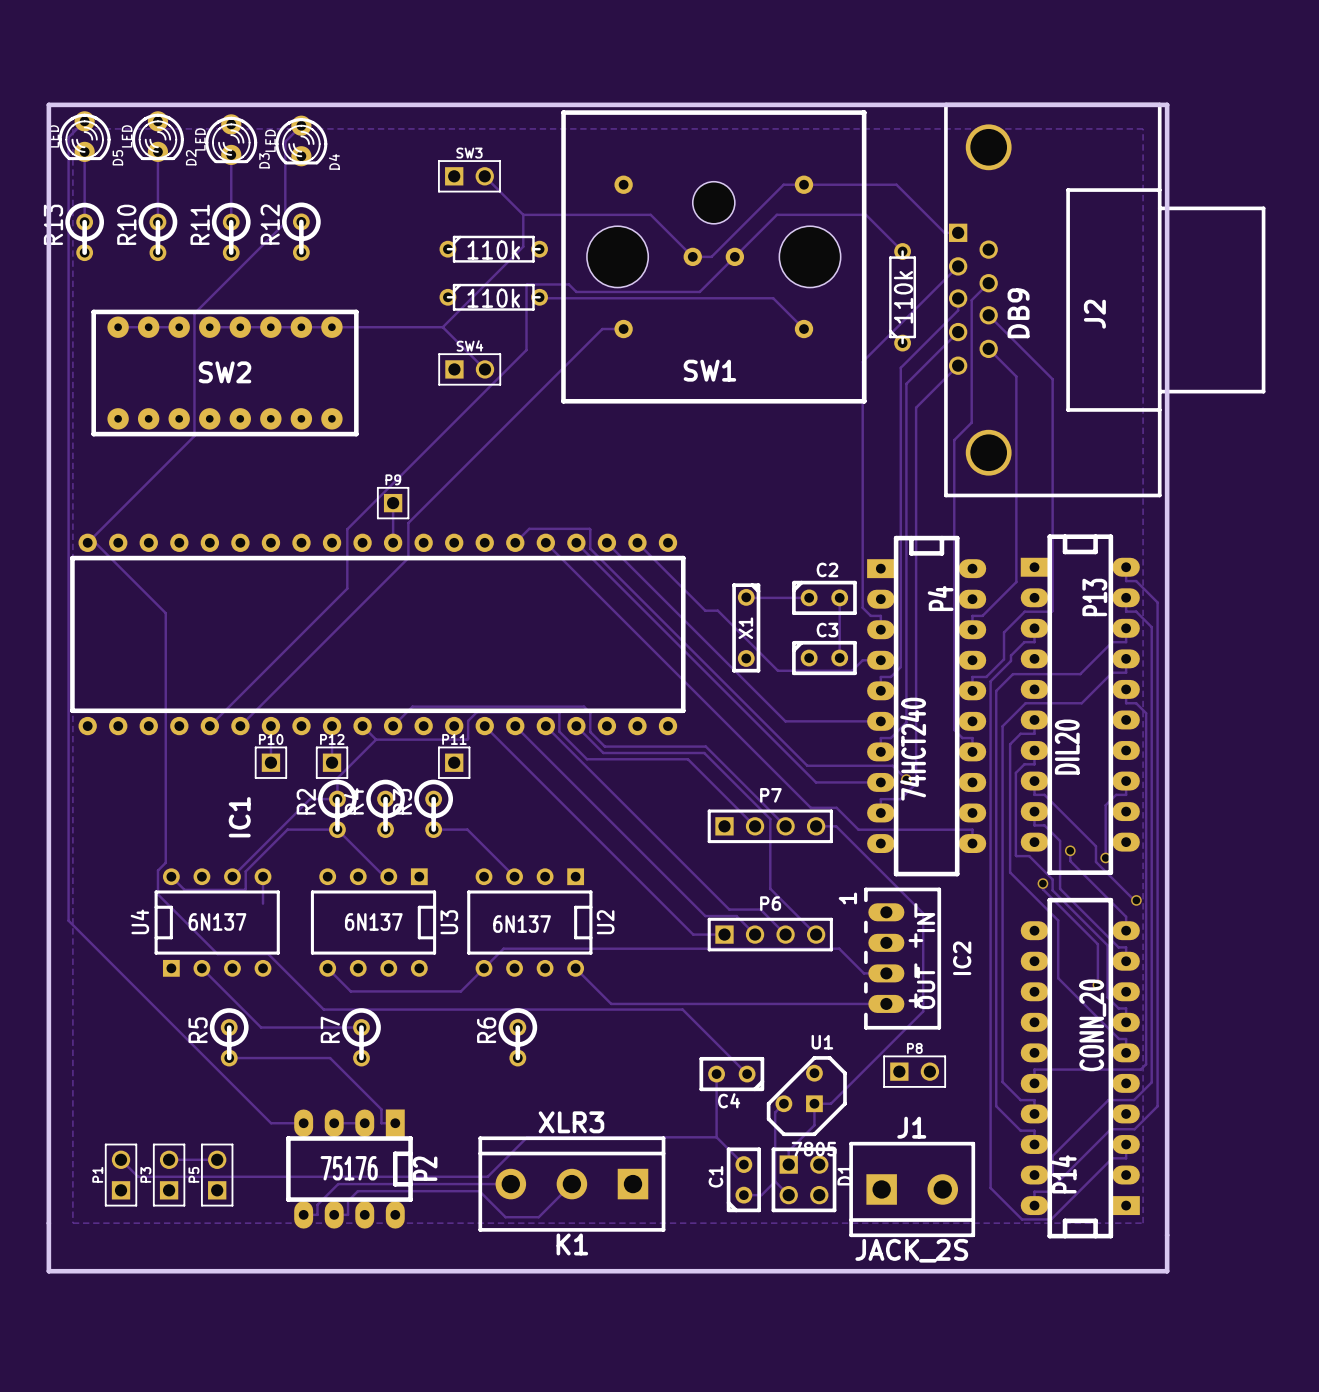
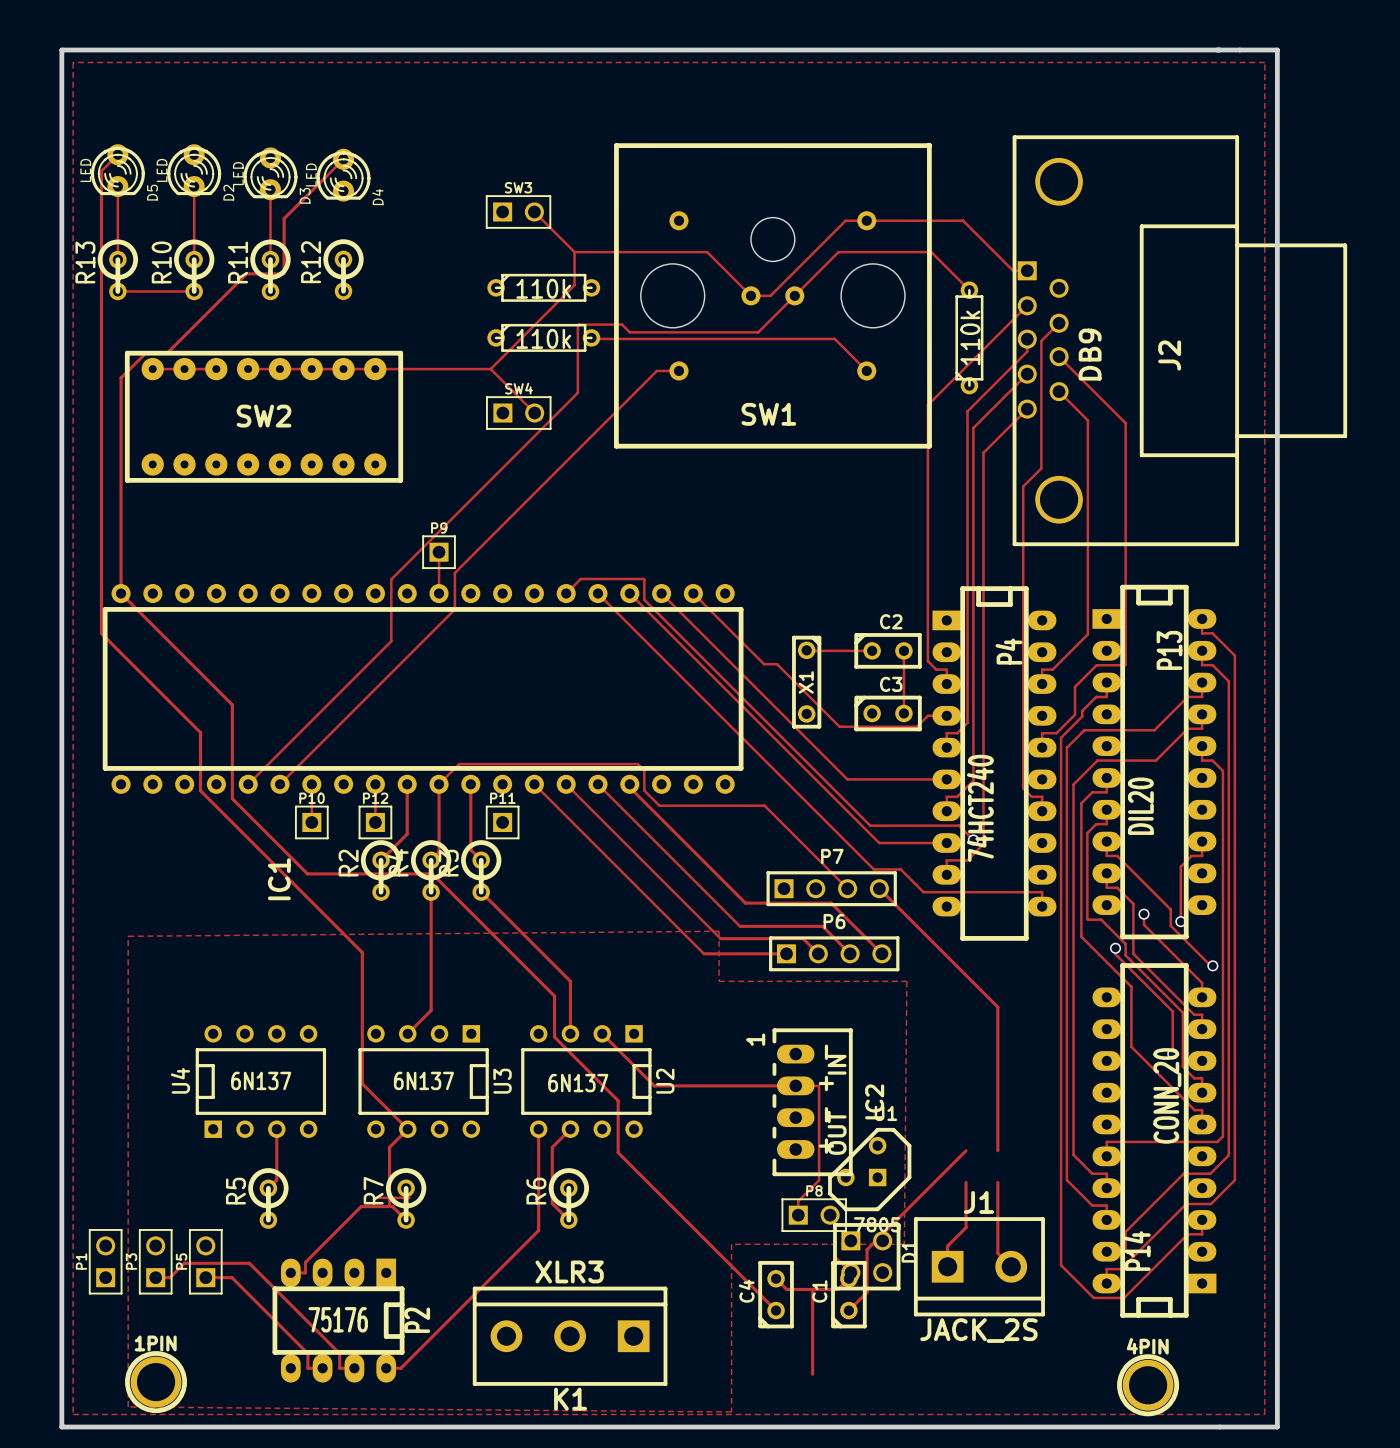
board edge: (48, 104) (48, 1271) (1167, 1271) (1167, 104) (48, 104) -> (61, 50) (61, 1427) (1277, 1427) (1277, 50) (61, 50)
zone outline: (72, 128) (1143, 128) (1143, 1223) (72, 1223) (72, 128) -> (73, 62) (73, 1414) (1264, 1414) (1264, 62) (73, 62)
track: (68, 137) (68, 920) (271, 1123) (303, 1123) -> (101, 171) (101, 633) (200, 732) (200, 790) (362, 952) (362, 1083) (407, 1129) (389, 1147) (389, 1206)
track: (285, 141) (285, 222) (194, 313) (194, 436) (87, 542) -> (326, 176) (284, 218) (283, 273) (246, 273) (167, 353) (145, 353) (121, 378) (121, 593) (232, 704) (232, 798) (307, 873) (432, 873) (554, 996) (554, 1037) (618, 1100) (618, 1152) (776, 1310)
track: none -> (117, 291) (194, 291)
track: (91, 538) (165, 613) (165, 862) (157, 870) (157, 894) (217, 954) (268, 954) (323, 1009) (682, 1009) (747, 1074) -> none
track: (362, 726) (376, 739) -> (407, 784) (407, 834) (381, 860)
track: none -> (439, 784) (439, 852) (431, 860)
track: none -> (470, 784) (470, 849) (481, 860)
track: (576, 726) (603, 753) (704, 753) (770, 819) (770, 888) (816, 934) -> (629, 784) (629, 787) (745, 903) (831, 903) (881, 953)
track: (376, 739) (467, 739) (468, 720) (476, 712) (558, 712) (559, 731) (587, 759) (687, 759) (755, 826) -> none
track: (376, 739) (337, 778) (337, 799) (310, 799) (232, 876) -> none
track: (816, 826) (836, 826) (923, 913) (923, 1011) (830, 1103) (814, 1103) (814, 1125) (788, 1151) (788, 1164) -> (879, 888) (997, 1007) (997, 1150)
track: none -> (431, 892) (431, 1010) (407, 1033)
track: (433, 829) (467, 829) (514, 876) -> (481, 892) (570, 981) (570, 1033)
track: (682, 862) (729, 909) (760, 909) (785, 934) -> (740, 926) (822, 926) (850, 953)
zone outline: none -> (719, 931) (128, 936) (128, 1406) (731, 1411) (731, 1244) (904, 1244) (906, 981) (719, 981) (719, 931)
track: (663, 874) (705, 916) (736, 916) (755, 934) -> (720, 938) (803, 938) (818, 953)
track: (171, 876) (184, 889) (245, 889) (245, 871) (287, 829) (337, 829) (384, 876) (388, 876) -> none
track: (263, 876) (263, 903) -> none
track: (647, 888) (693, 934) (724, 934) -> (703, 953) (786, 953)
U4 position: (217, 922) -> (260, 1081)
U3 position: (373, 922) -> (423, 1081)
U2 position: (529, 922) -> (586, 1081)
P6 position: (770, 934) -> (834, 953)
IC2 position: (902, 958) -> (812, 1102)
track: none -> (602, 1033) (654, 1085) (819, 1085) (819, 1180) (798, 1201) (798, 1215)
track: (201, 968) (261, 1027) (361, 1027) -> none
track: (327, 968) (350, 991) (460, 991) (503, 948) (839, 948) (863, 973) (886, 973) -> none
track: (575, 968) (611, 1003) (886, 1003) -> none
R5 position: (229, 1037) -> (268, 1198)
R7 position: (361, 1037) -> (406, 1198)
R6 position: (517, 1037) -> (568, 1198)
track: none -> (276, 1129) (276, 1179) (268, 1188)
track: none -> (538, 1129) (538, 1230) (400, 1368) (386, 1368)
track: none -> (570, 1129) (552, 1147) (552, 1203) (568, 1220)
track: (229, 1058) (330, 1058) (381, 1109) (381, 1123) (395, 1123) -> none
P8 position: (914, 1071) -> (814, 1215)
track: (716, 1074) (716, 1137) -> none
C4 rotation: 0° (731, 1074) -> 90° clockwise (776, 1294)
C4 position: (731, 1074) -> (776, 1294)
track: none -> (966, 1150) (867, 1249) (867, 1292) (848, 1310)
track: (783, 1103) (775, 1112) (775, 1181) (761, 1195) (743, 1195) -> none
track: none -> (966, 1182) (966, 1227) (947, 1246) (947, 1266)
track: none -> (997, 1182) (997, 1253) (1011, 1266)
track: (716, 1137) (527, 1137) (487, 1176) (138, 1176) (121, 1159) -> none
track: (716, 1137) (743, 1164) -> none
track: none -> (406, 1220) (392, 1206) (361, 1206) (305, 1262) (305, 1272) (290, 1272)
track: (169, 1159) (217, 1159) -> none
P2 position: (349, 1169) -> (338, 1320)
P1 position: (121, 1175) -> (105, 1261)
P3 position: (169, 1175) -> (155, 1261)
P5 position: (217, 1175) -> (205, 1261)
C1 position: (743, 1179) -> (848, 1294)
track: (510, 1184) (338, 1184) (317, 1204) (317, 1214) (303, 1214) -> none
track: (571, 1184) (538, 1217) (505, 1217) (479, 1191) (357, 1191) (348, 1201) (348, 1214) (334, 1214) -> none
K1 position: (571, 1184) -> (570, 1336)
track: none -> (155, 1277) (170, 1277) (184, 1263) (249, 1263) (339, 1353) (339, 1368) (354, 1368)
track: none -> (205, 1277) (231, 1277) (307, 1353) (307, 1368) (322, 1368)
track: none -> (776, 1278) (786, 1289) (838, 1289) (848, 1278)
track: none -> (812, 1289) (812, 1374)
1PIN: none -> (156, 1382)
4PIN: none -> (1148, 1385)

